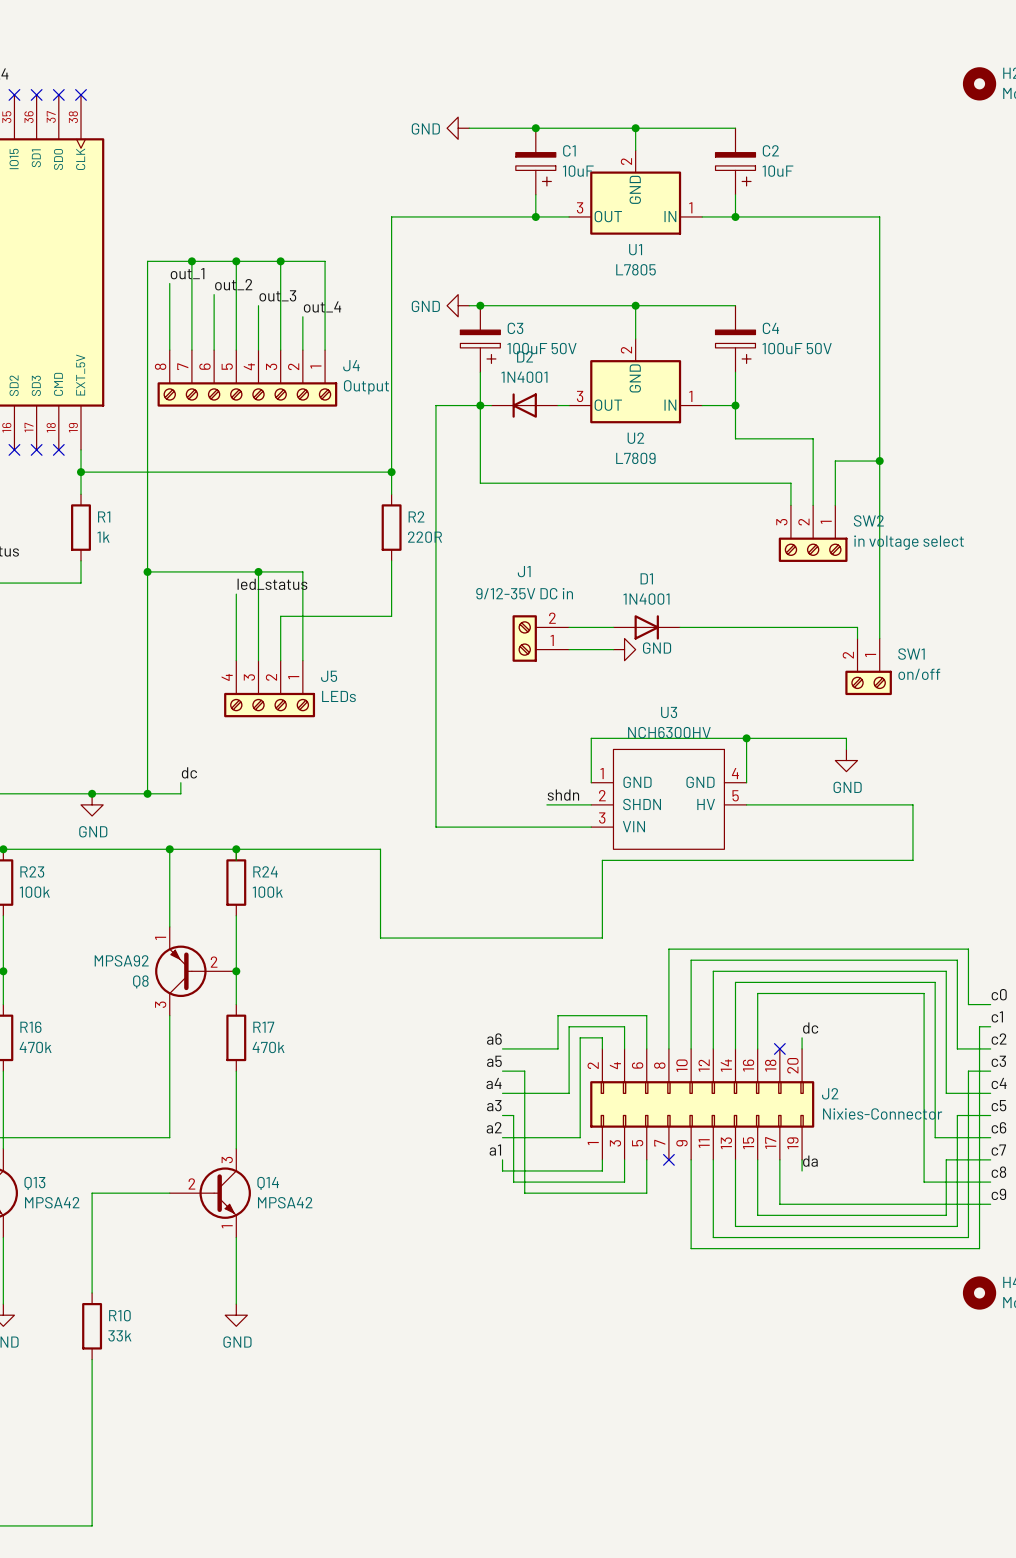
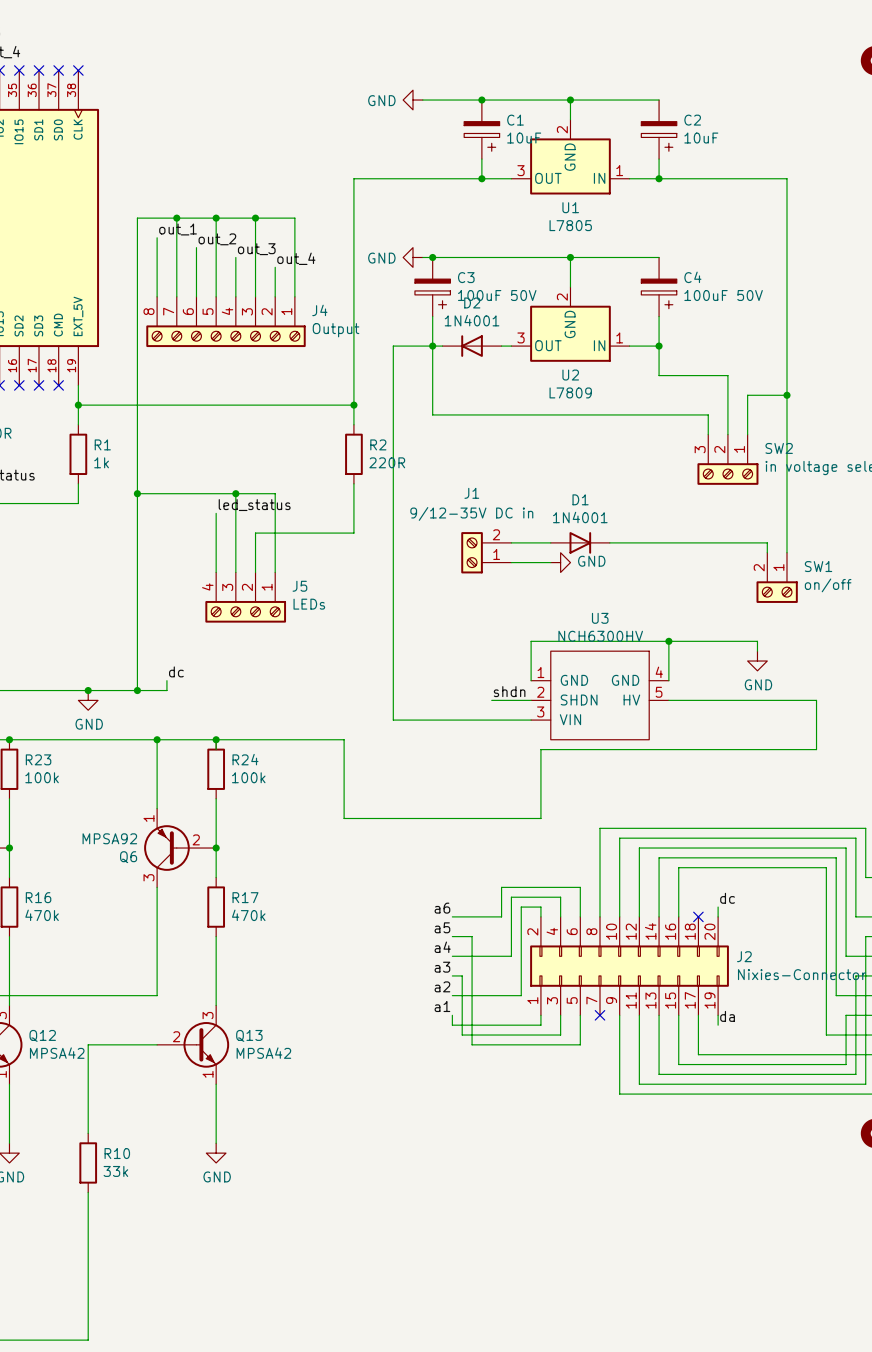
Q8 name: Q8 (140, 981) -> Q6 (128, 857)
Q13 name: Q13 (34, 1183) -> Q12 (42, 1035)
Q14 name: Q14 (268, 1183) -> Q13 (249, 1035)

